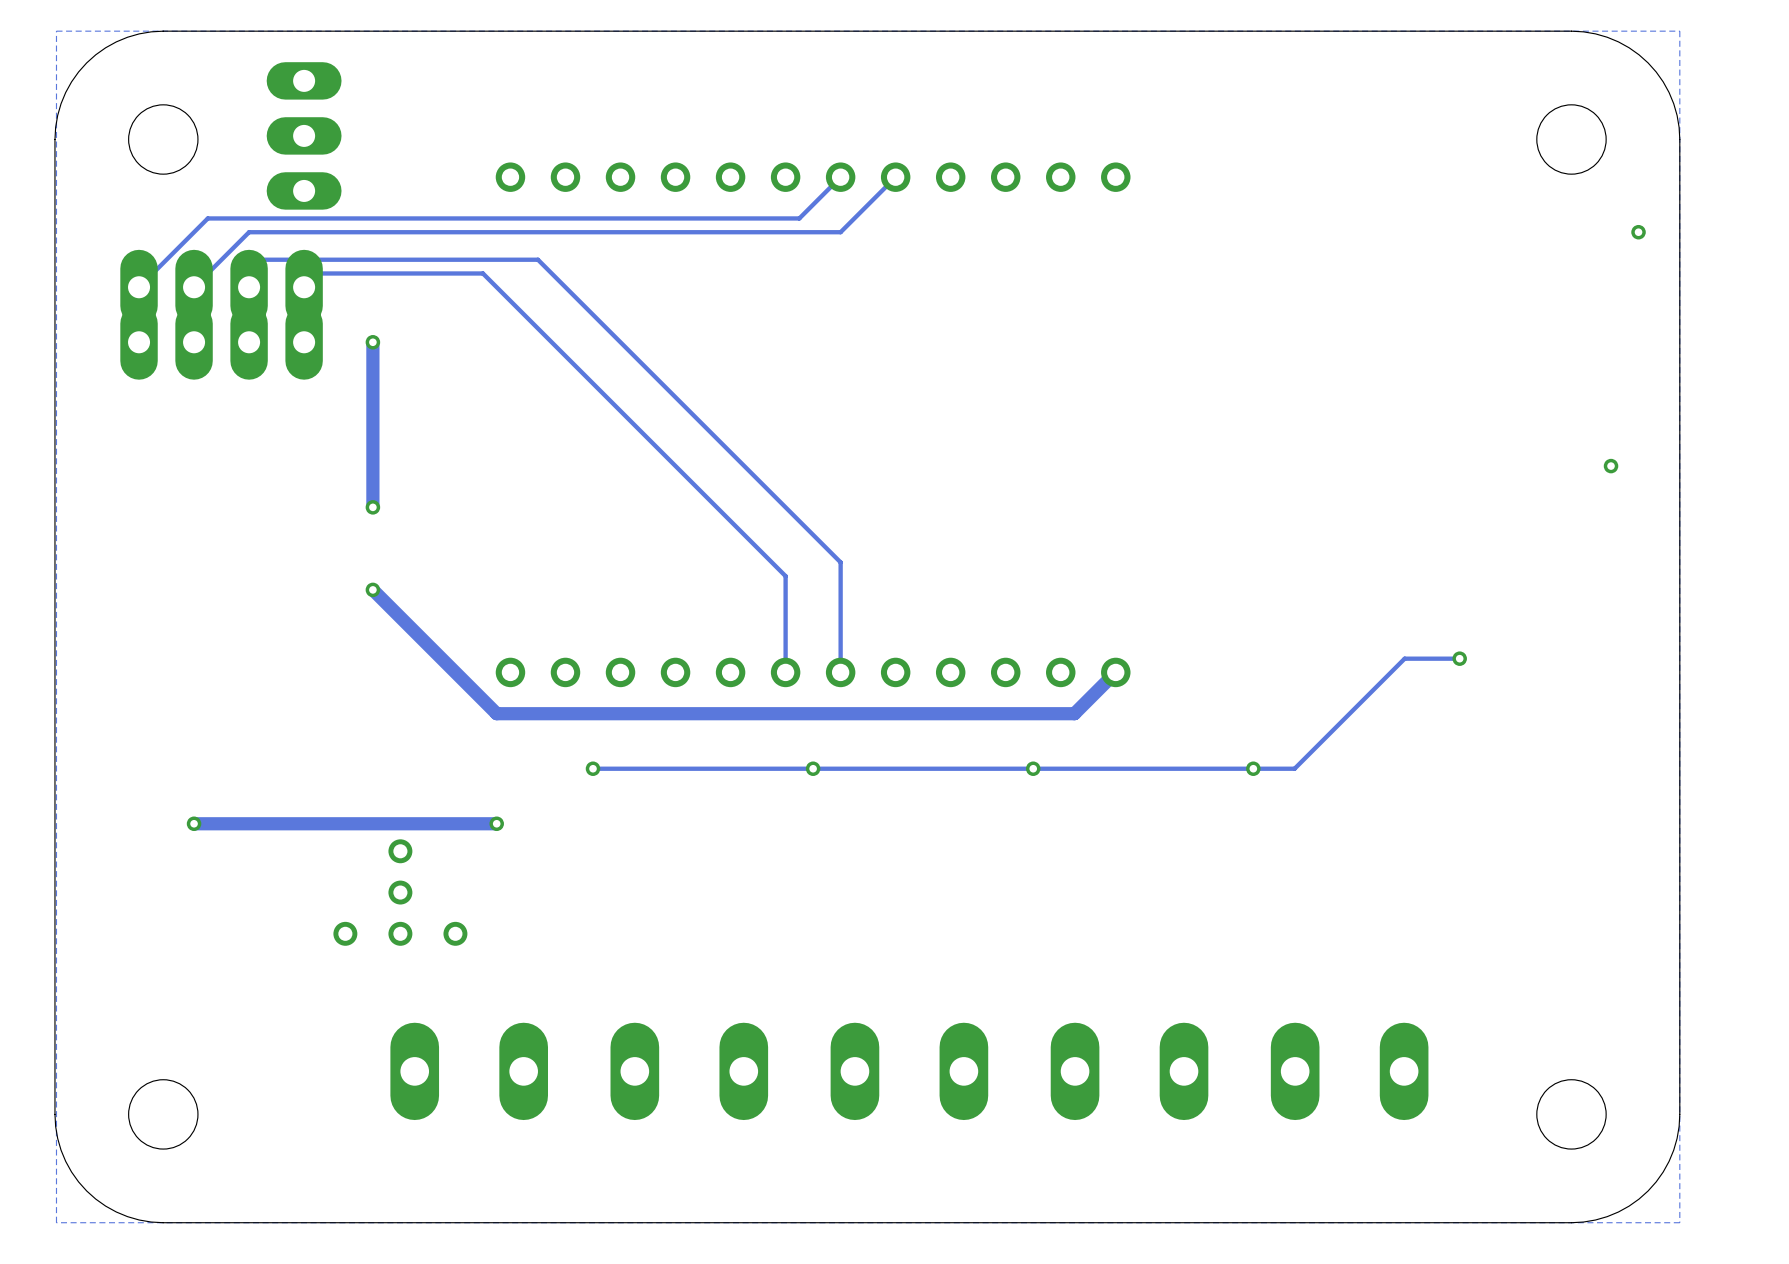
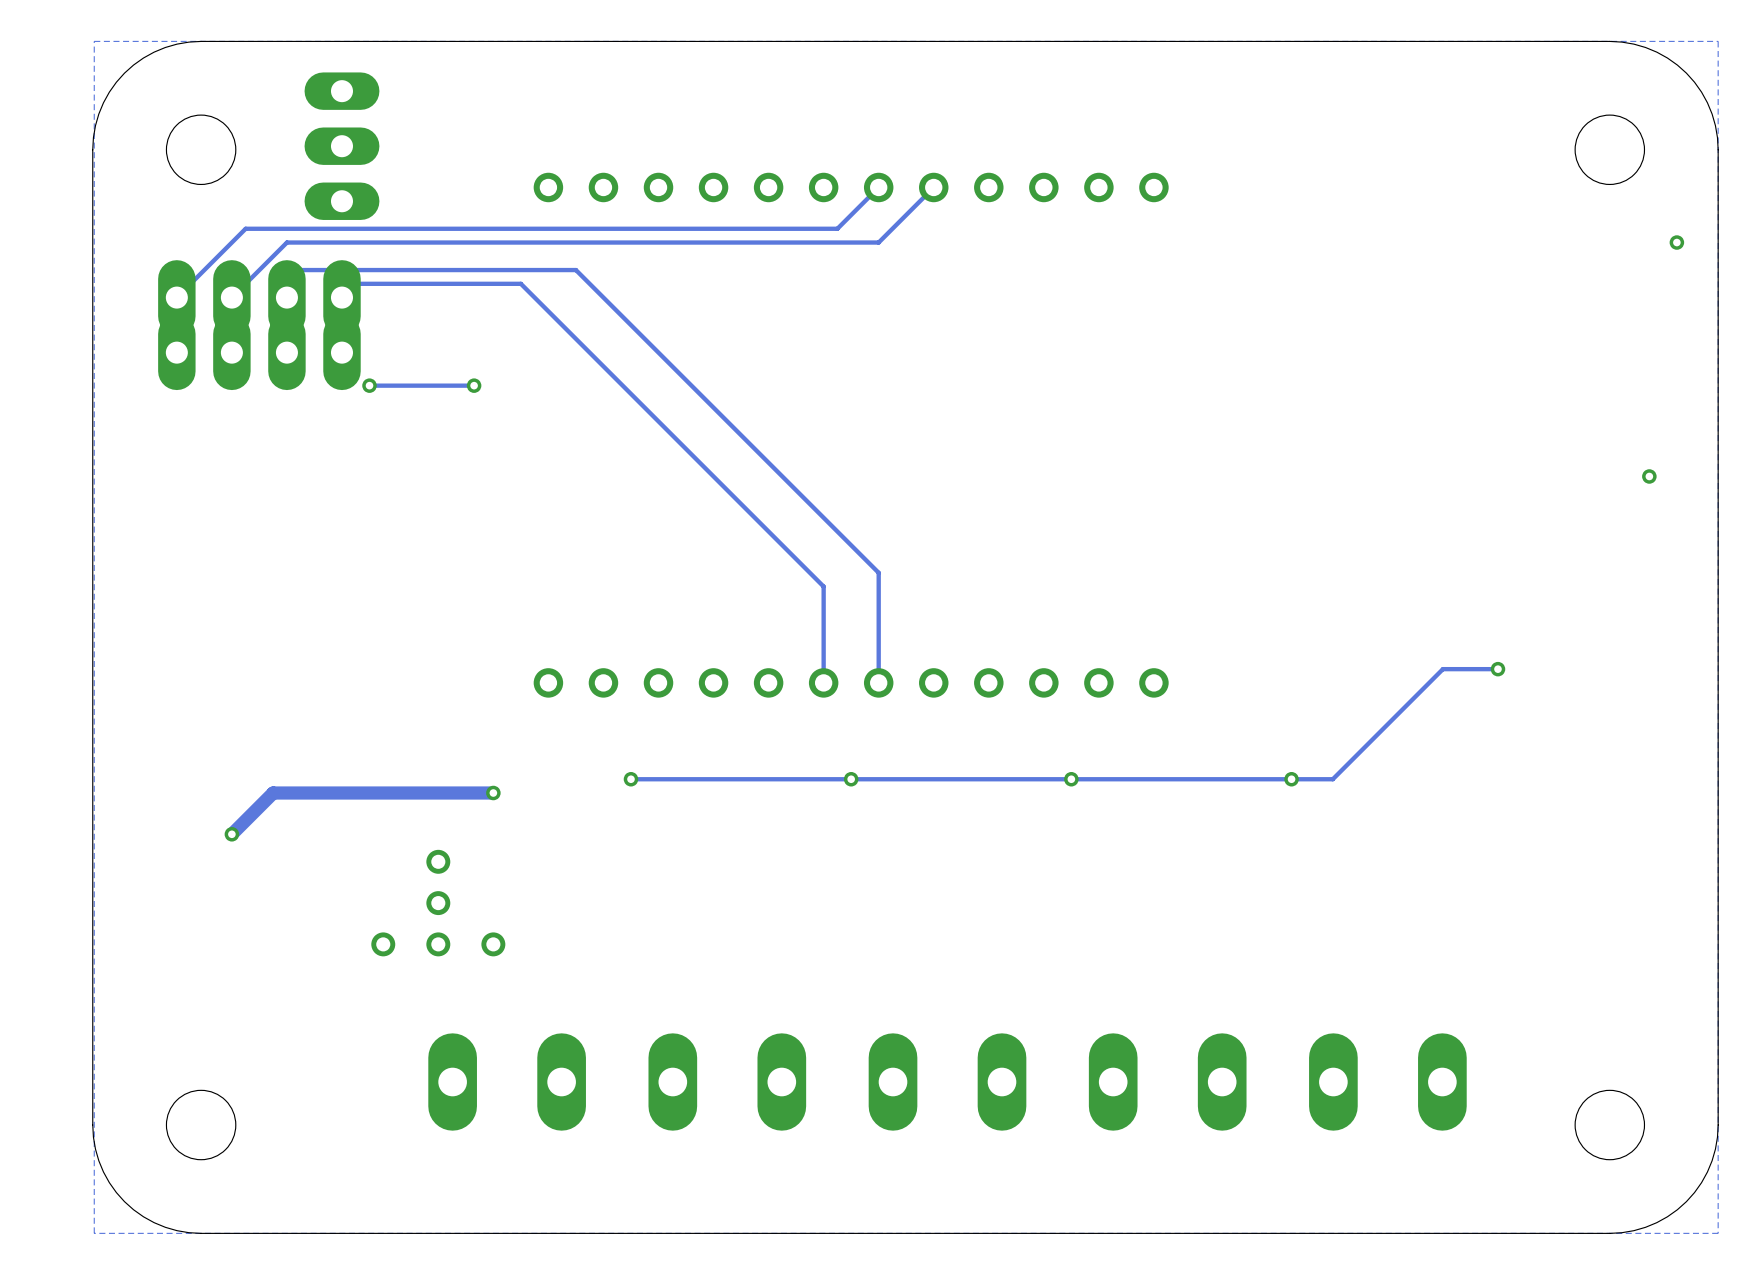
track: (372, 342) (372, 507) -> none
via: (372, 342) -> none
via: none -> (369, 385)
track: none -> (474, 385) (369, 385)
via: none -> (474, 385)
via: (372, 507) -> none
track: (372, 589) (496, 713) (1074, 713) (1115, 672) -> none
via: (372, 589) -> none
track: (496, 823) (194, 823) -> (493, 793) (273, 793) (231, 834)
via position: (496, 823) -> (493, 793)

